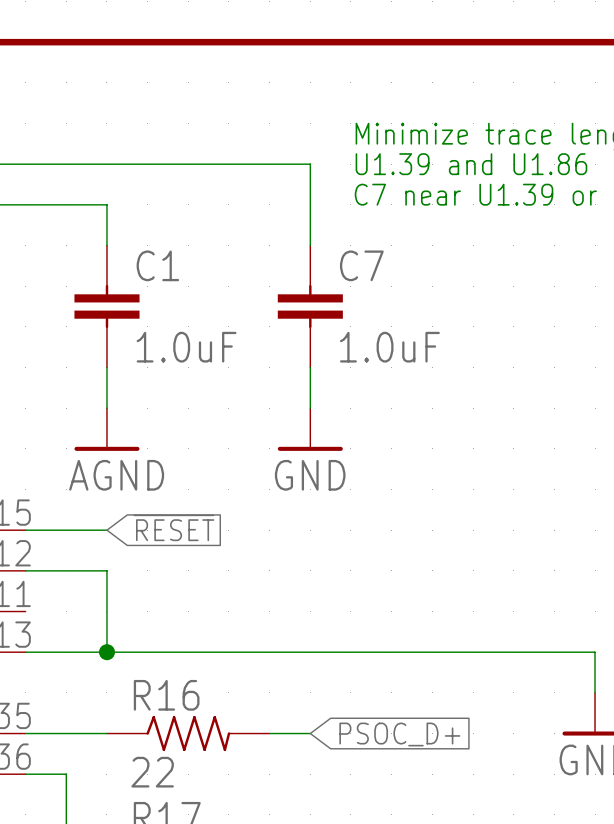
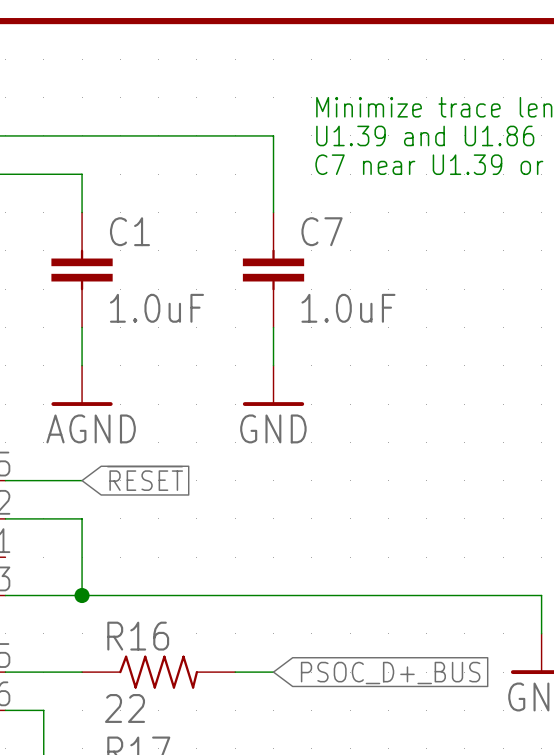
global label: PSOC_D+ (399, 734) -> PSOC_D+_BUS (390, 673)

